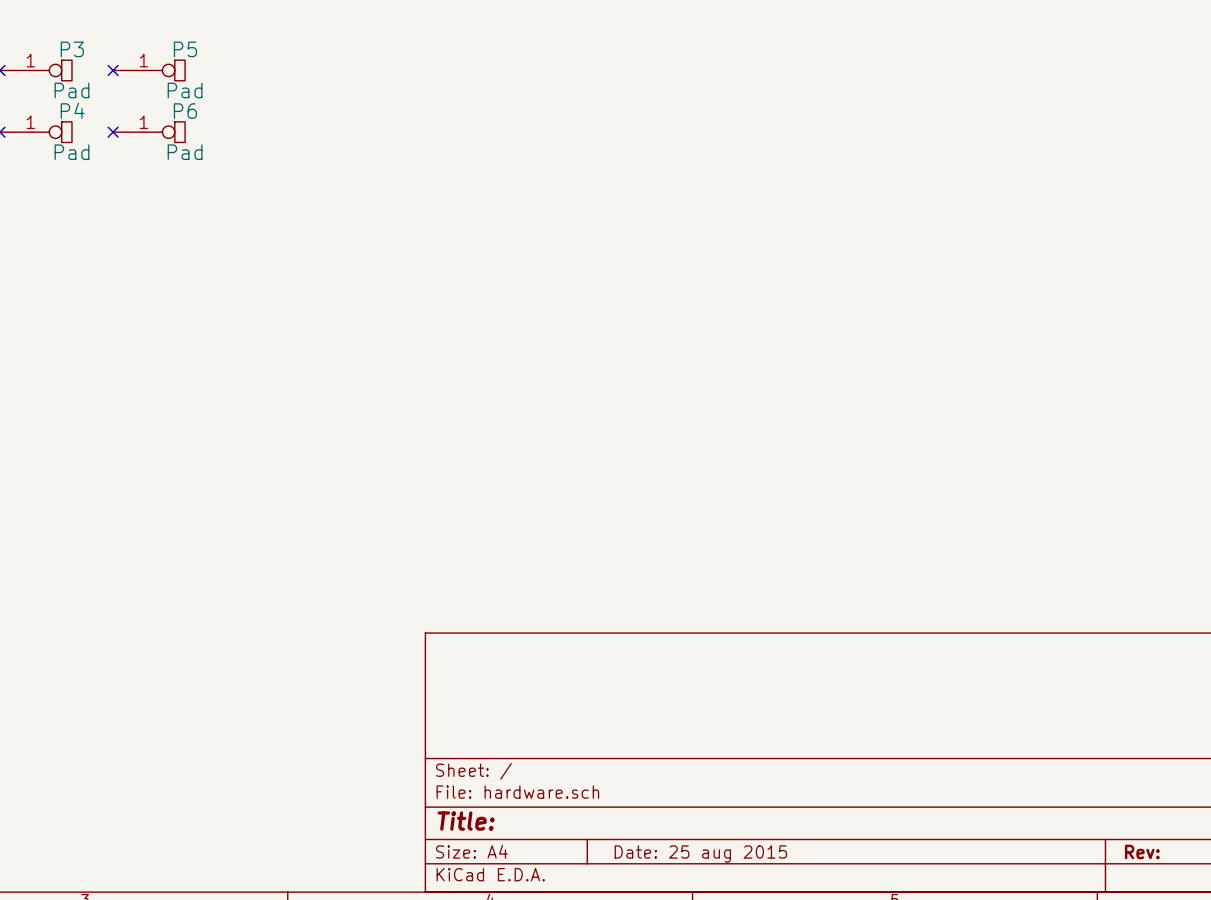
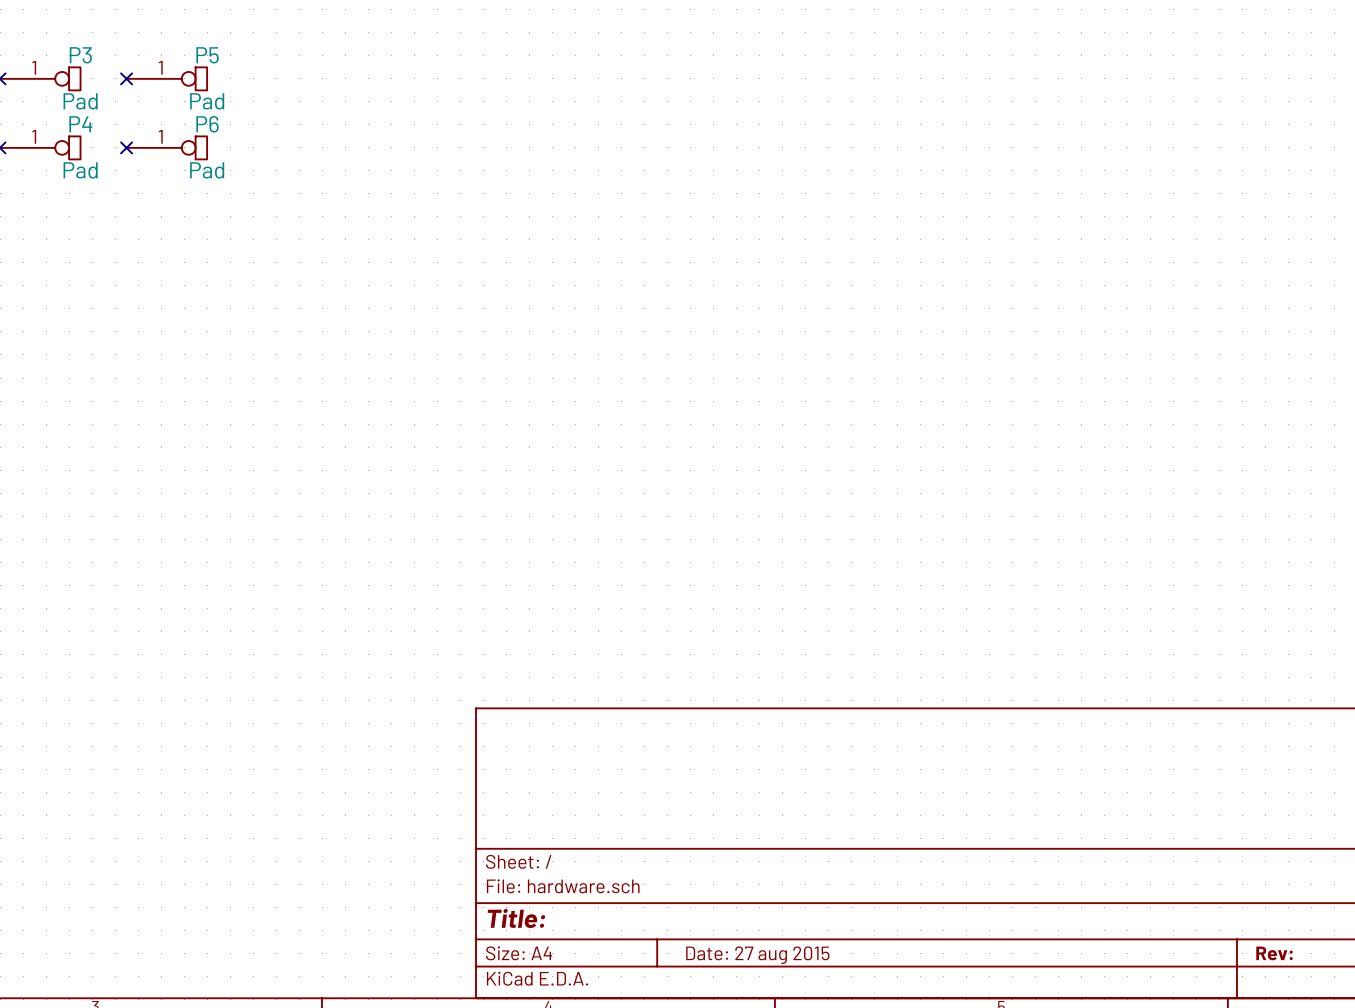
title block: Date: 25 aug 2015 (700, 854) -> Date: 27 aug 2015 (757, 955)

